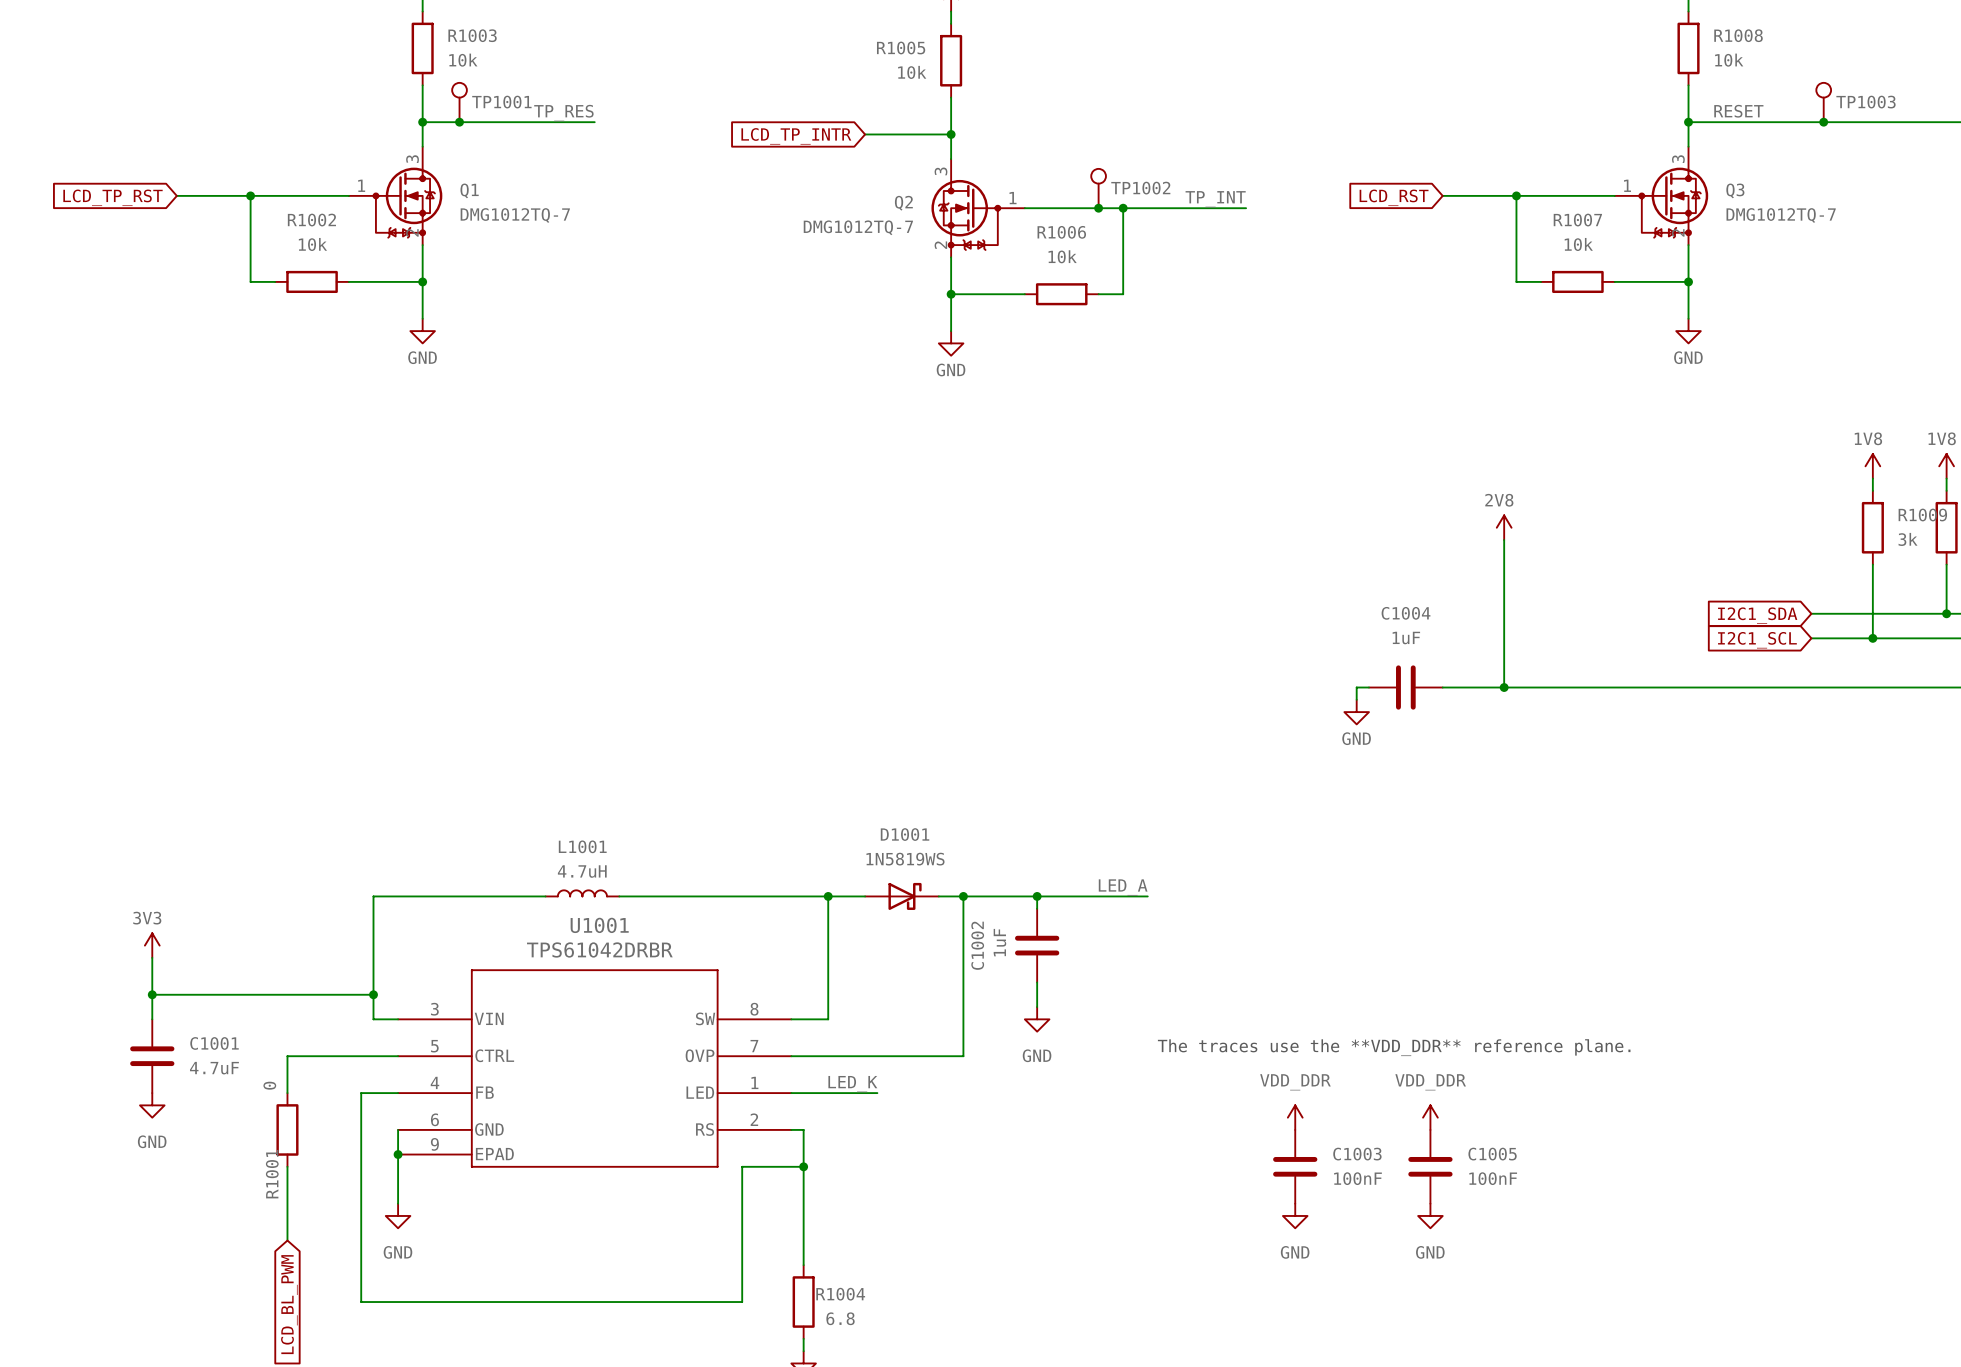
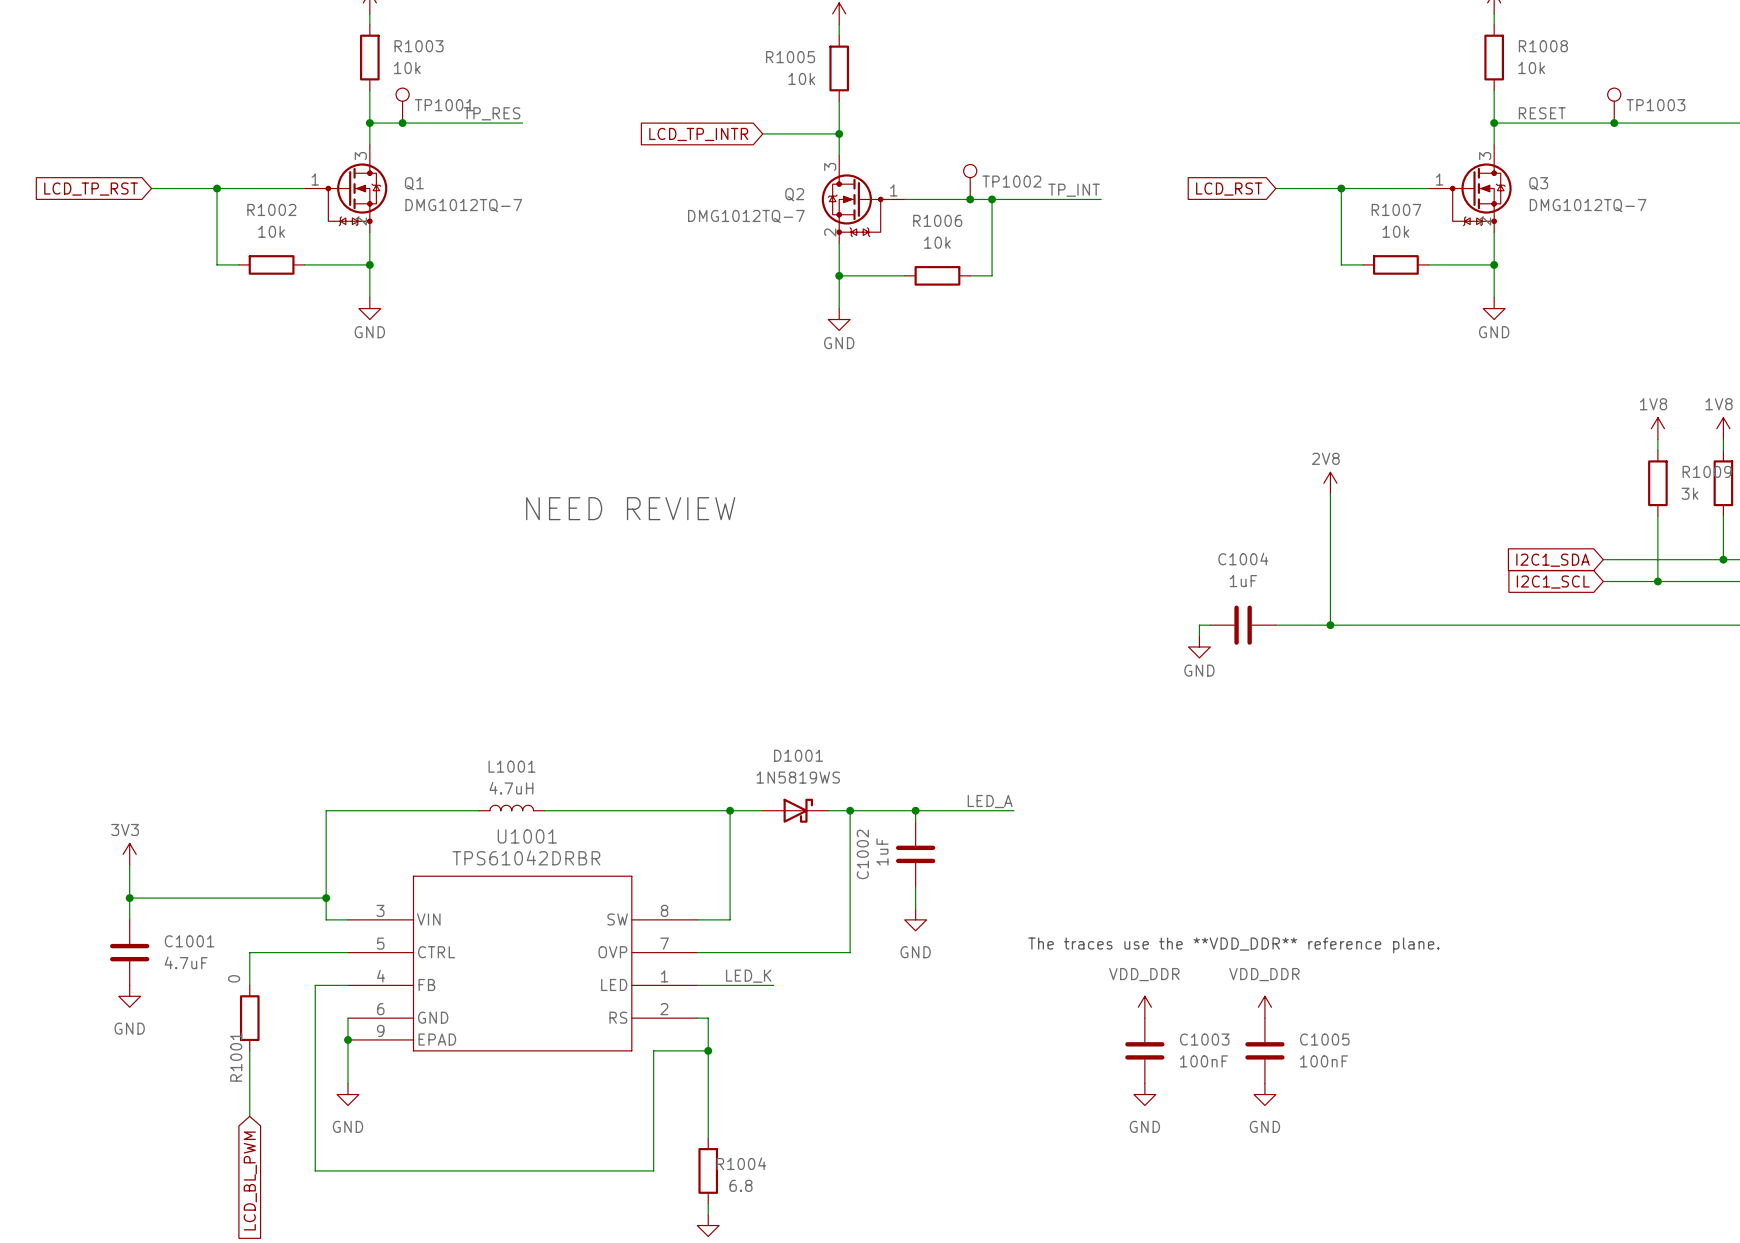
text: none -> NEED REVIEW (630, 508)

